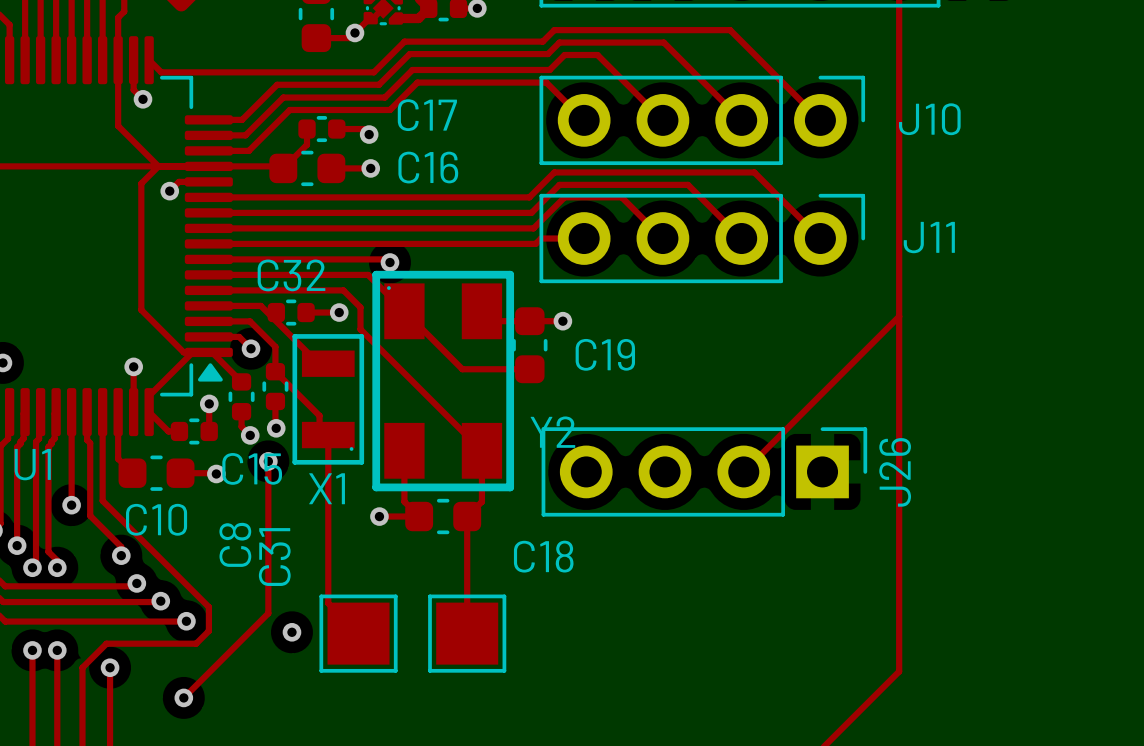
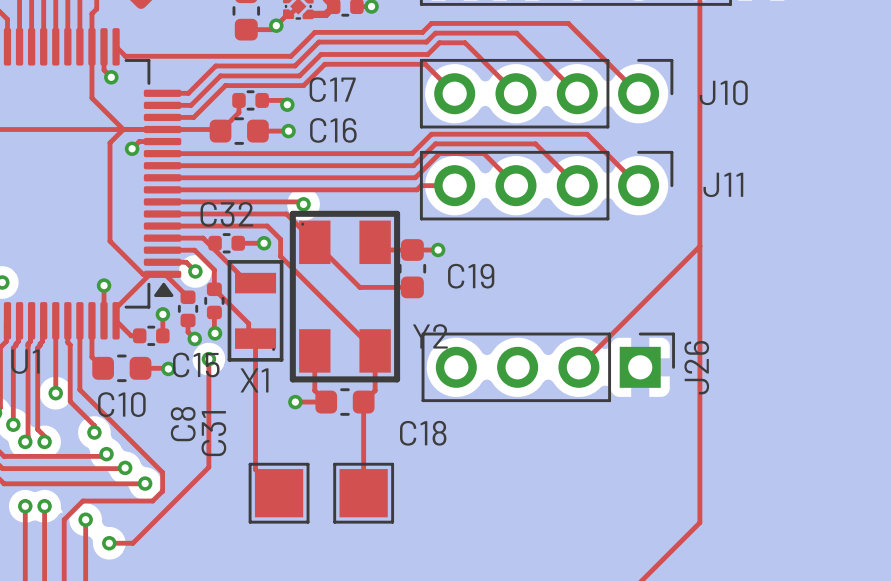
top track: (268, 600) (268, 613) (183, 697) -> (208, 467) (132, 543) (109, 543)
via: (291, 632) -> none
via position: (183, 697) -> (109, 543)

